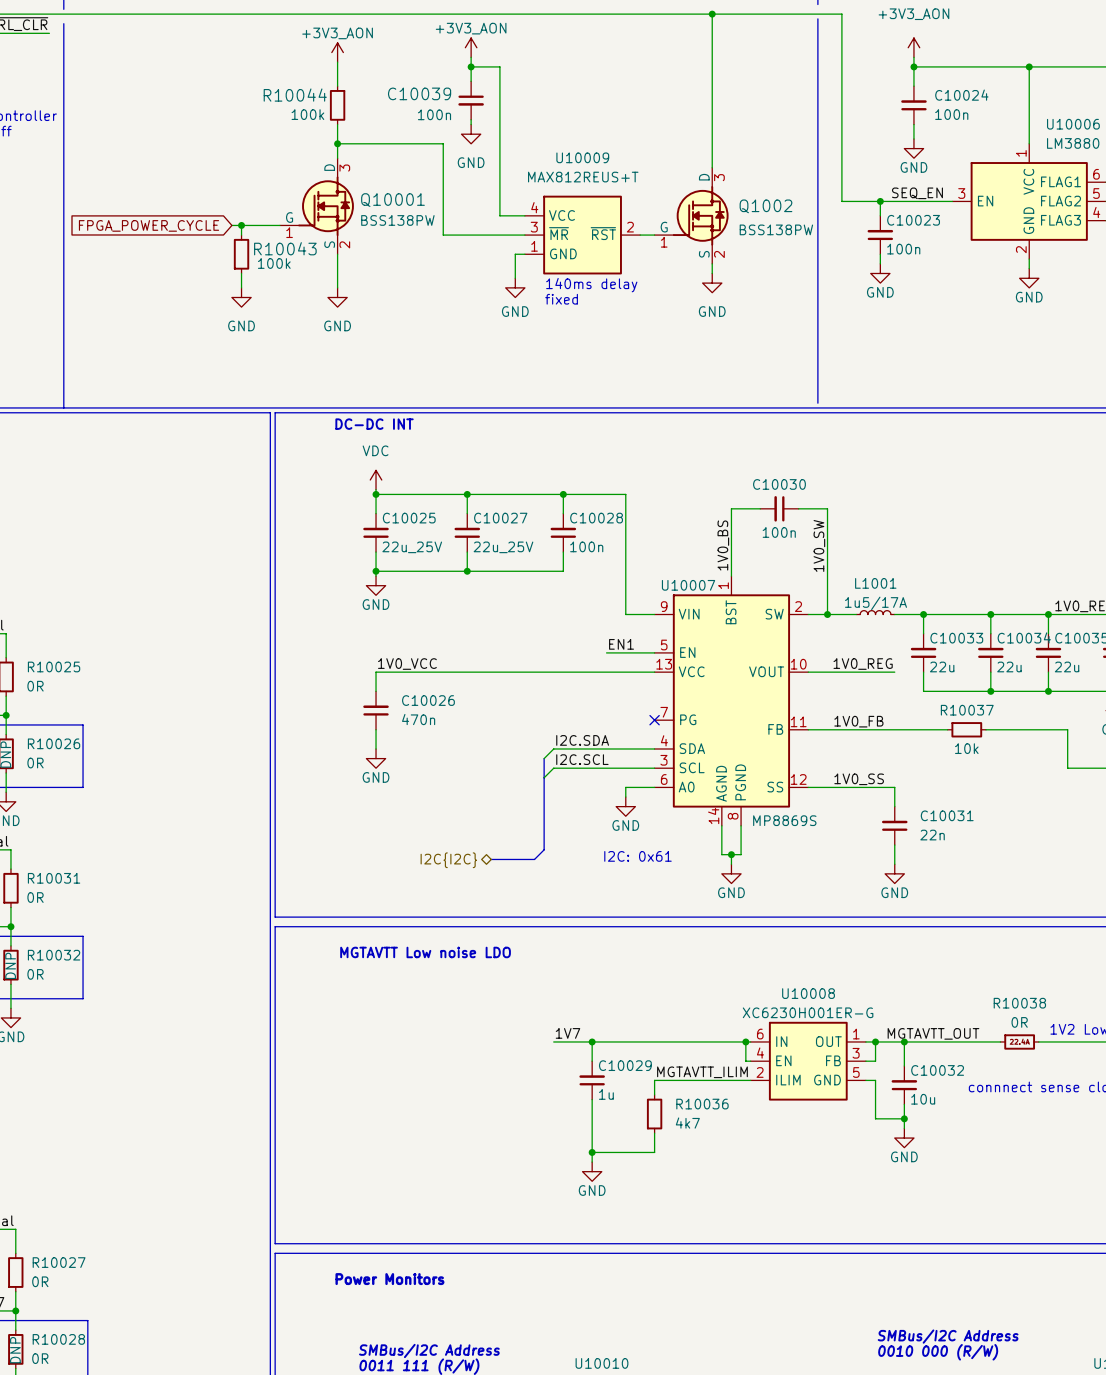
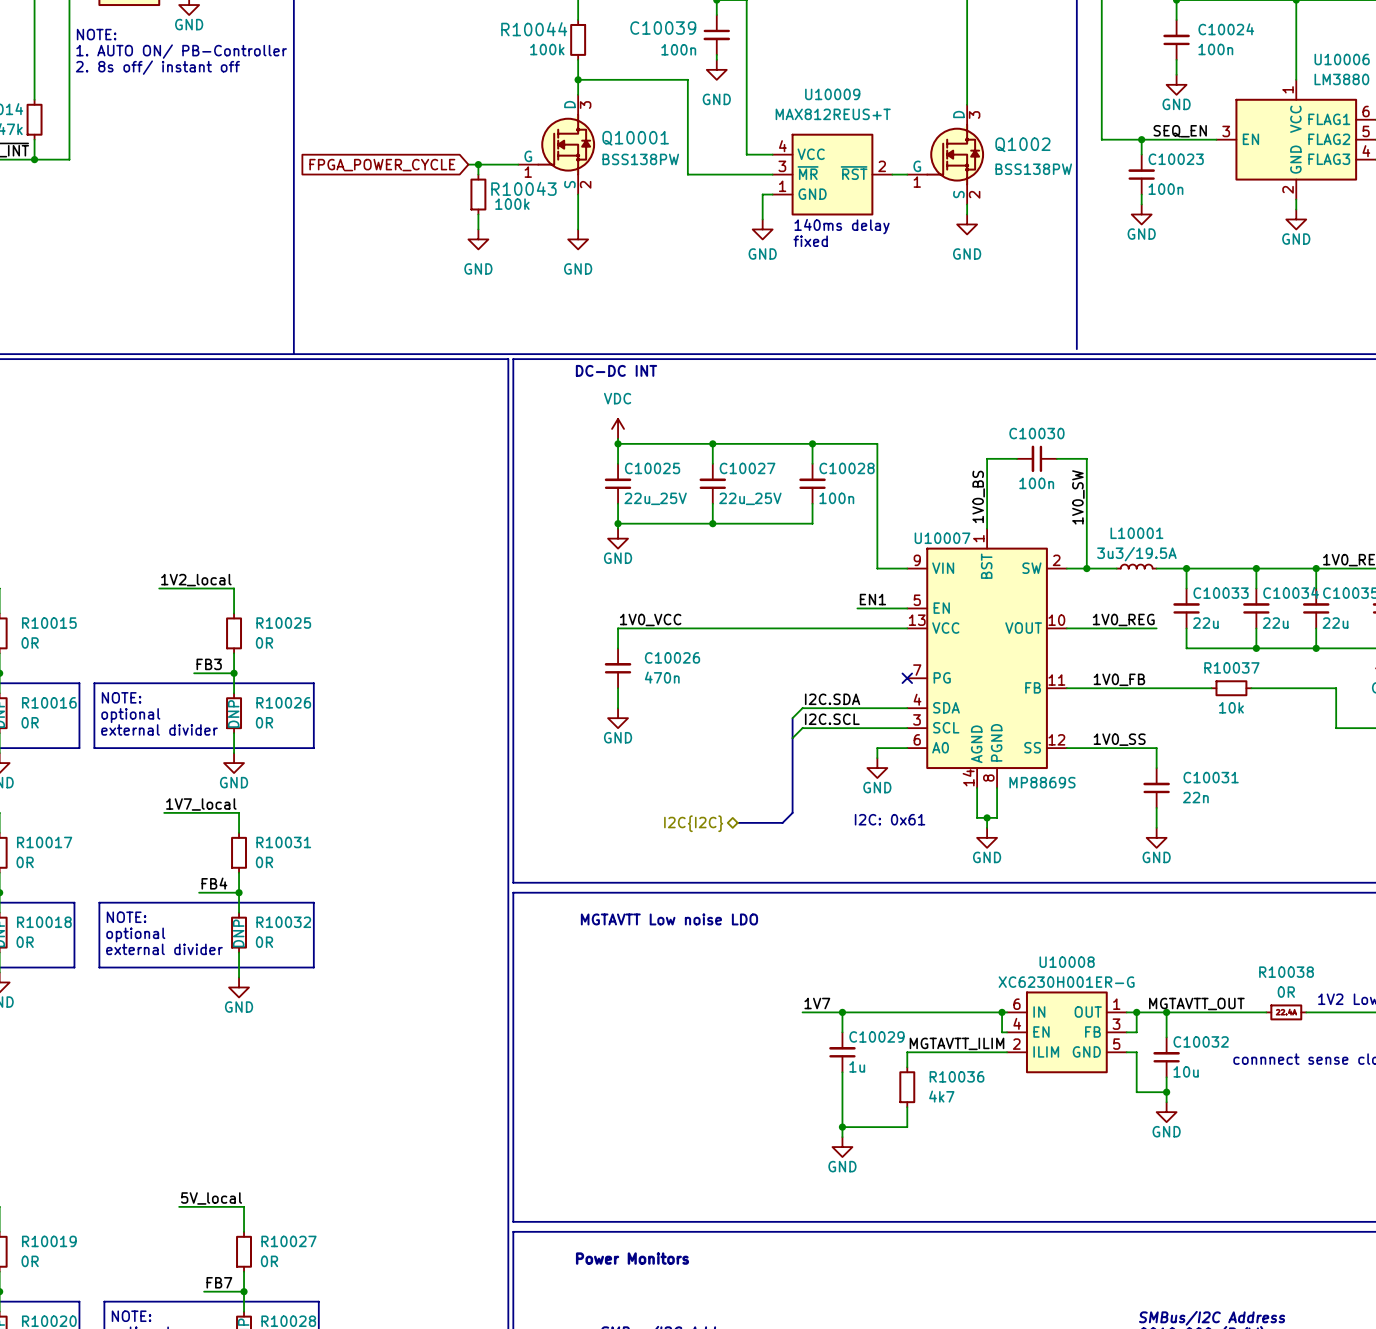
L1001 name: L1001 (875, 583) -> L10001 (1136, 533)
L1001 text: 1u5/17A (876, 603) -> 3u3/19.5A (1136, 554)

